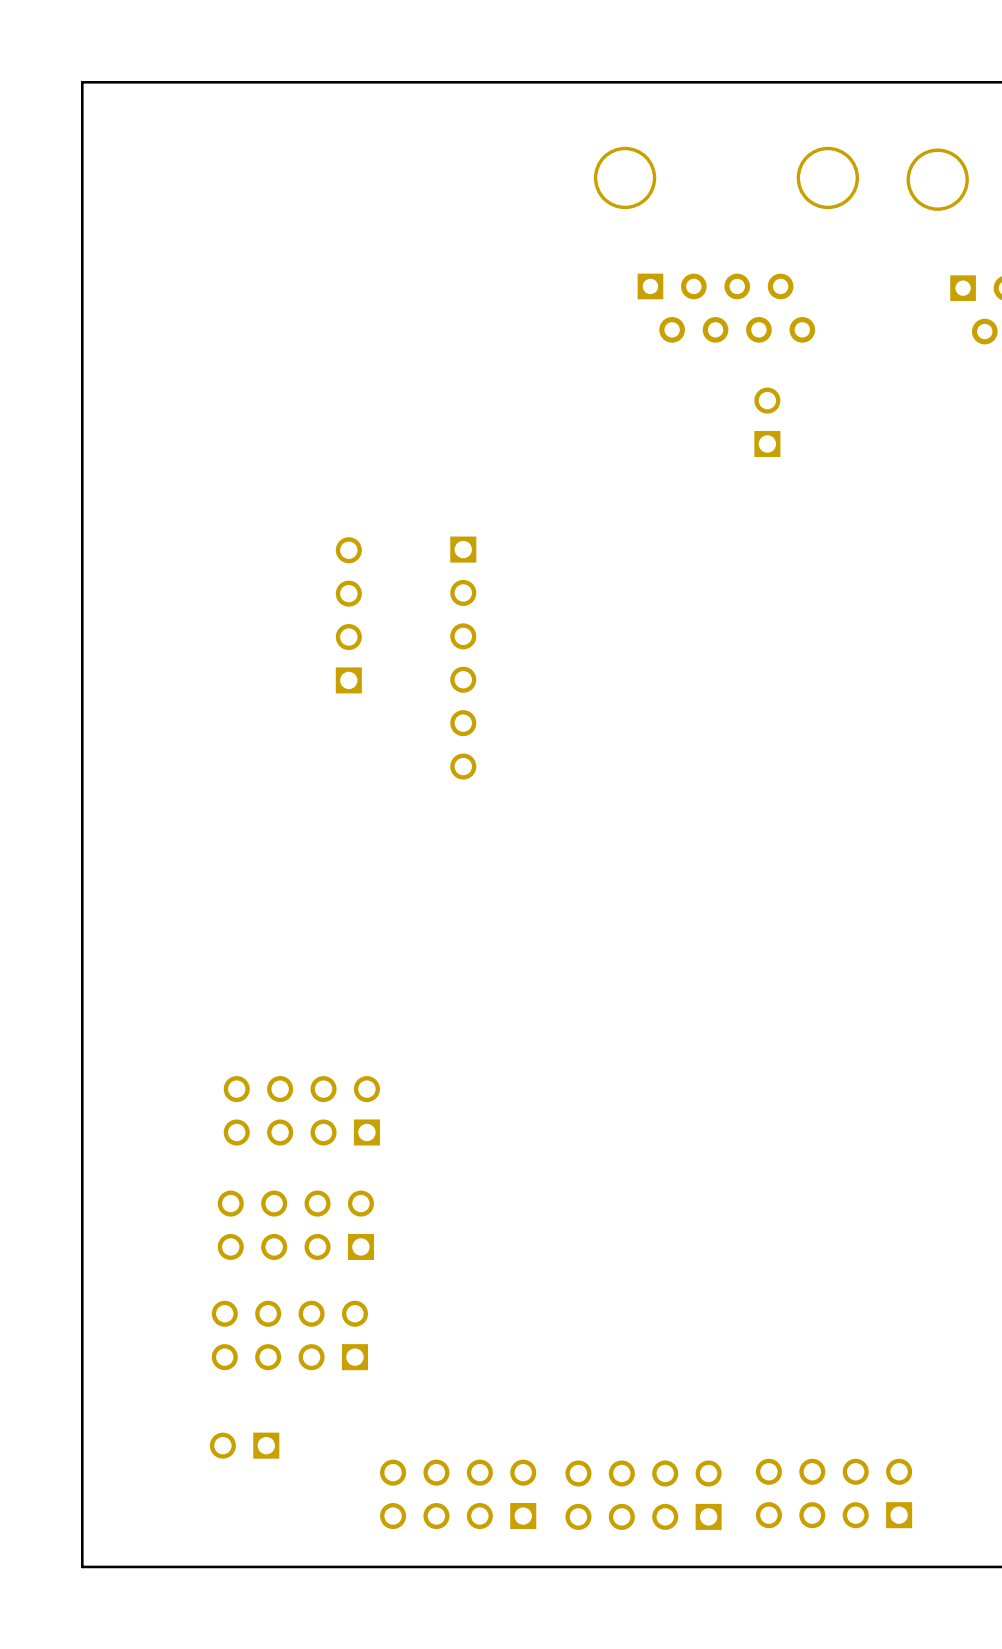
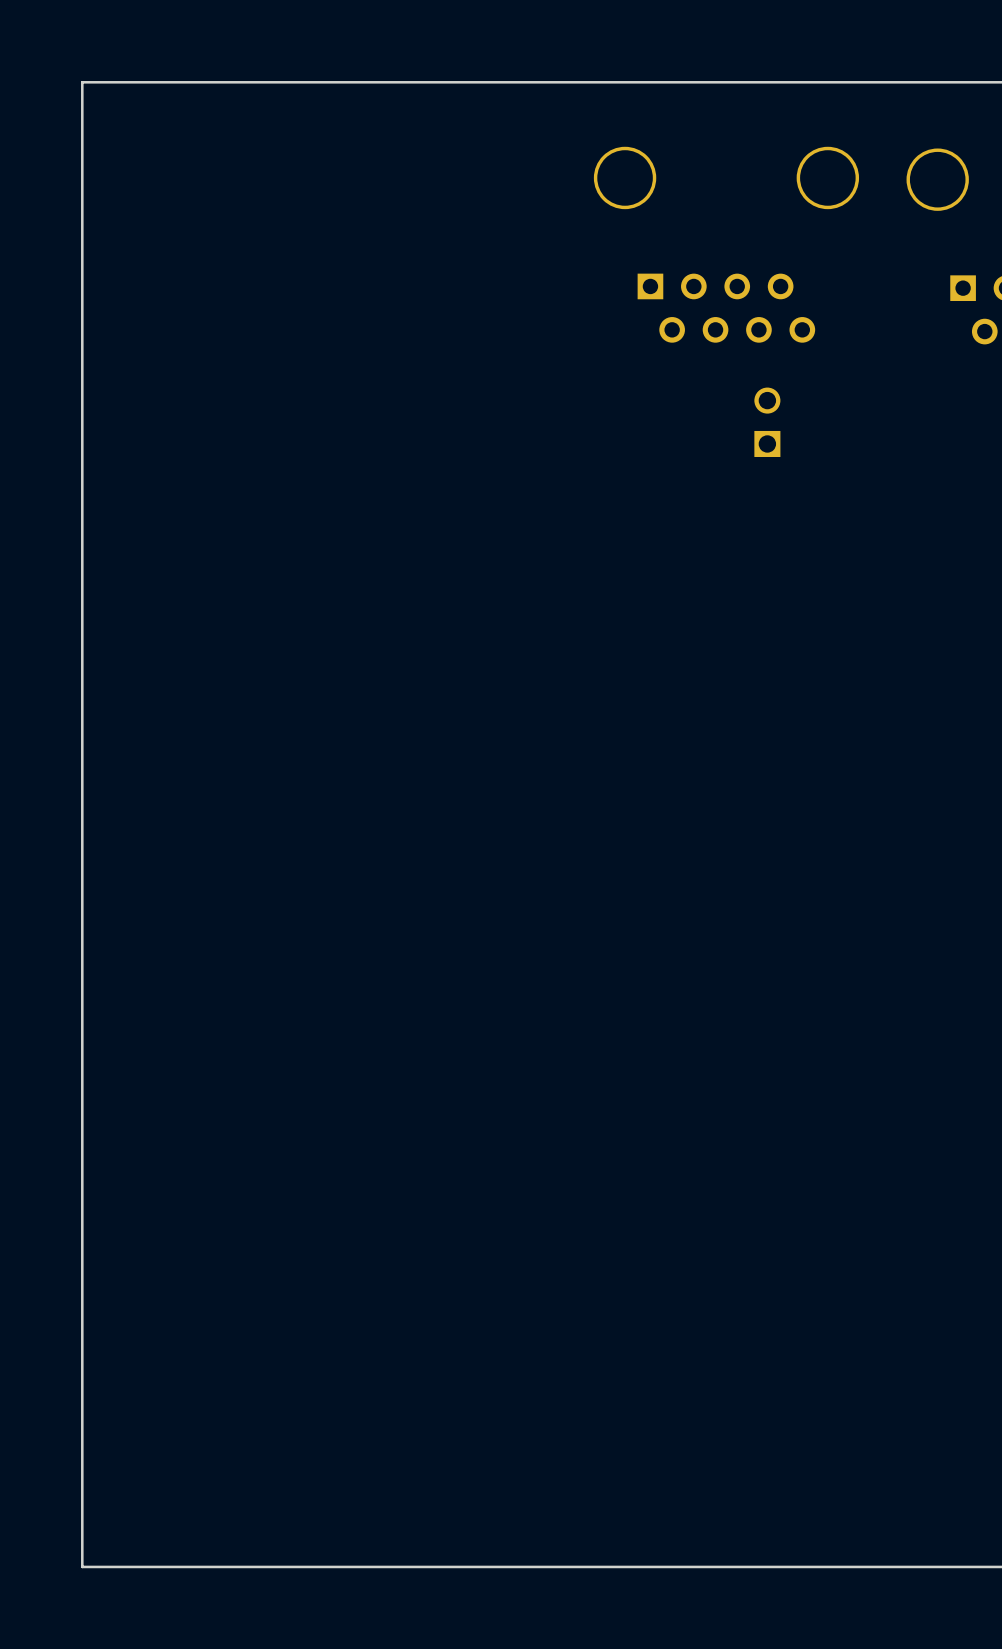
part: (348, 615) -> none
part: (463, 658) -> none
part: (301, 1110) -> none
part: (295, 1225) -> none
part: (289, 1335) -> none
part: (244, 1445) -> none
part: (834, 1493) -> none
part: (458, 1494) -> none
part: (643, 1495) -> none

